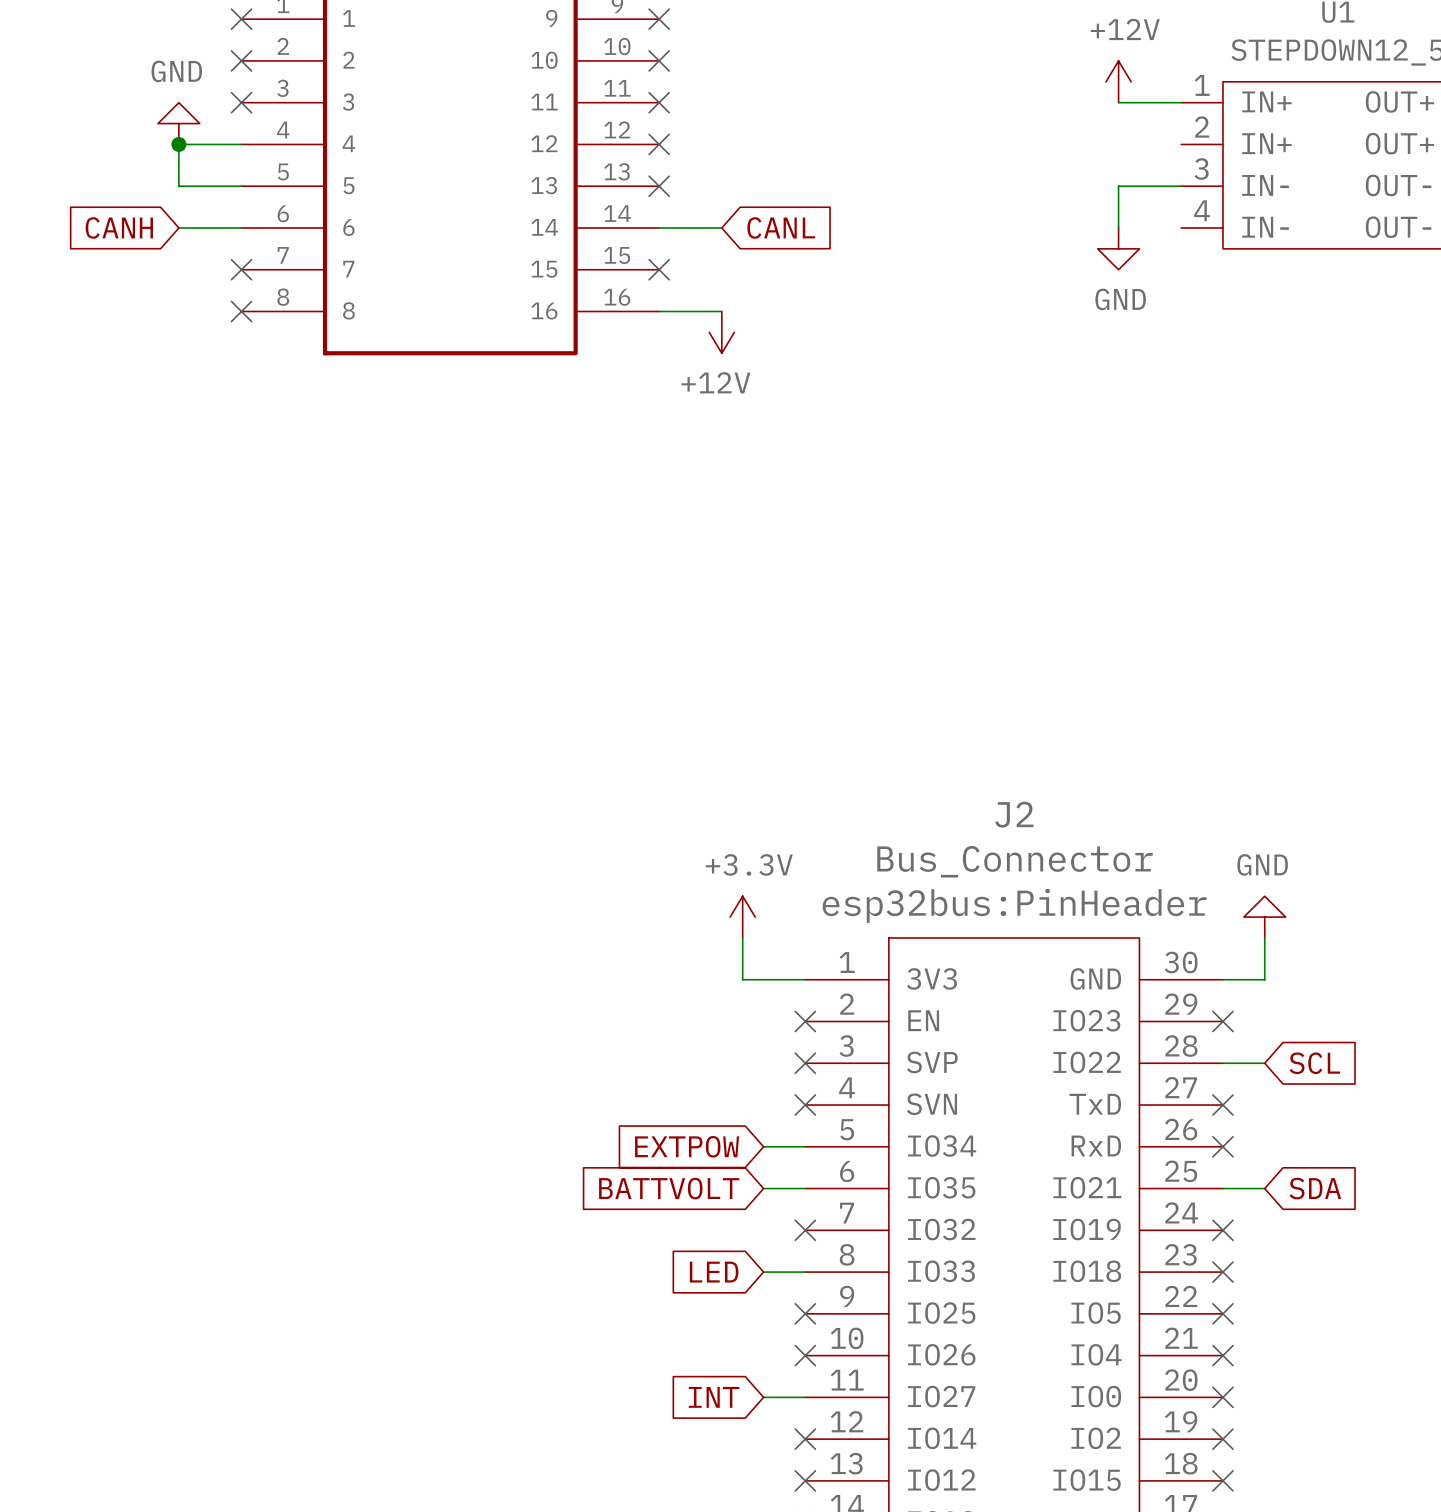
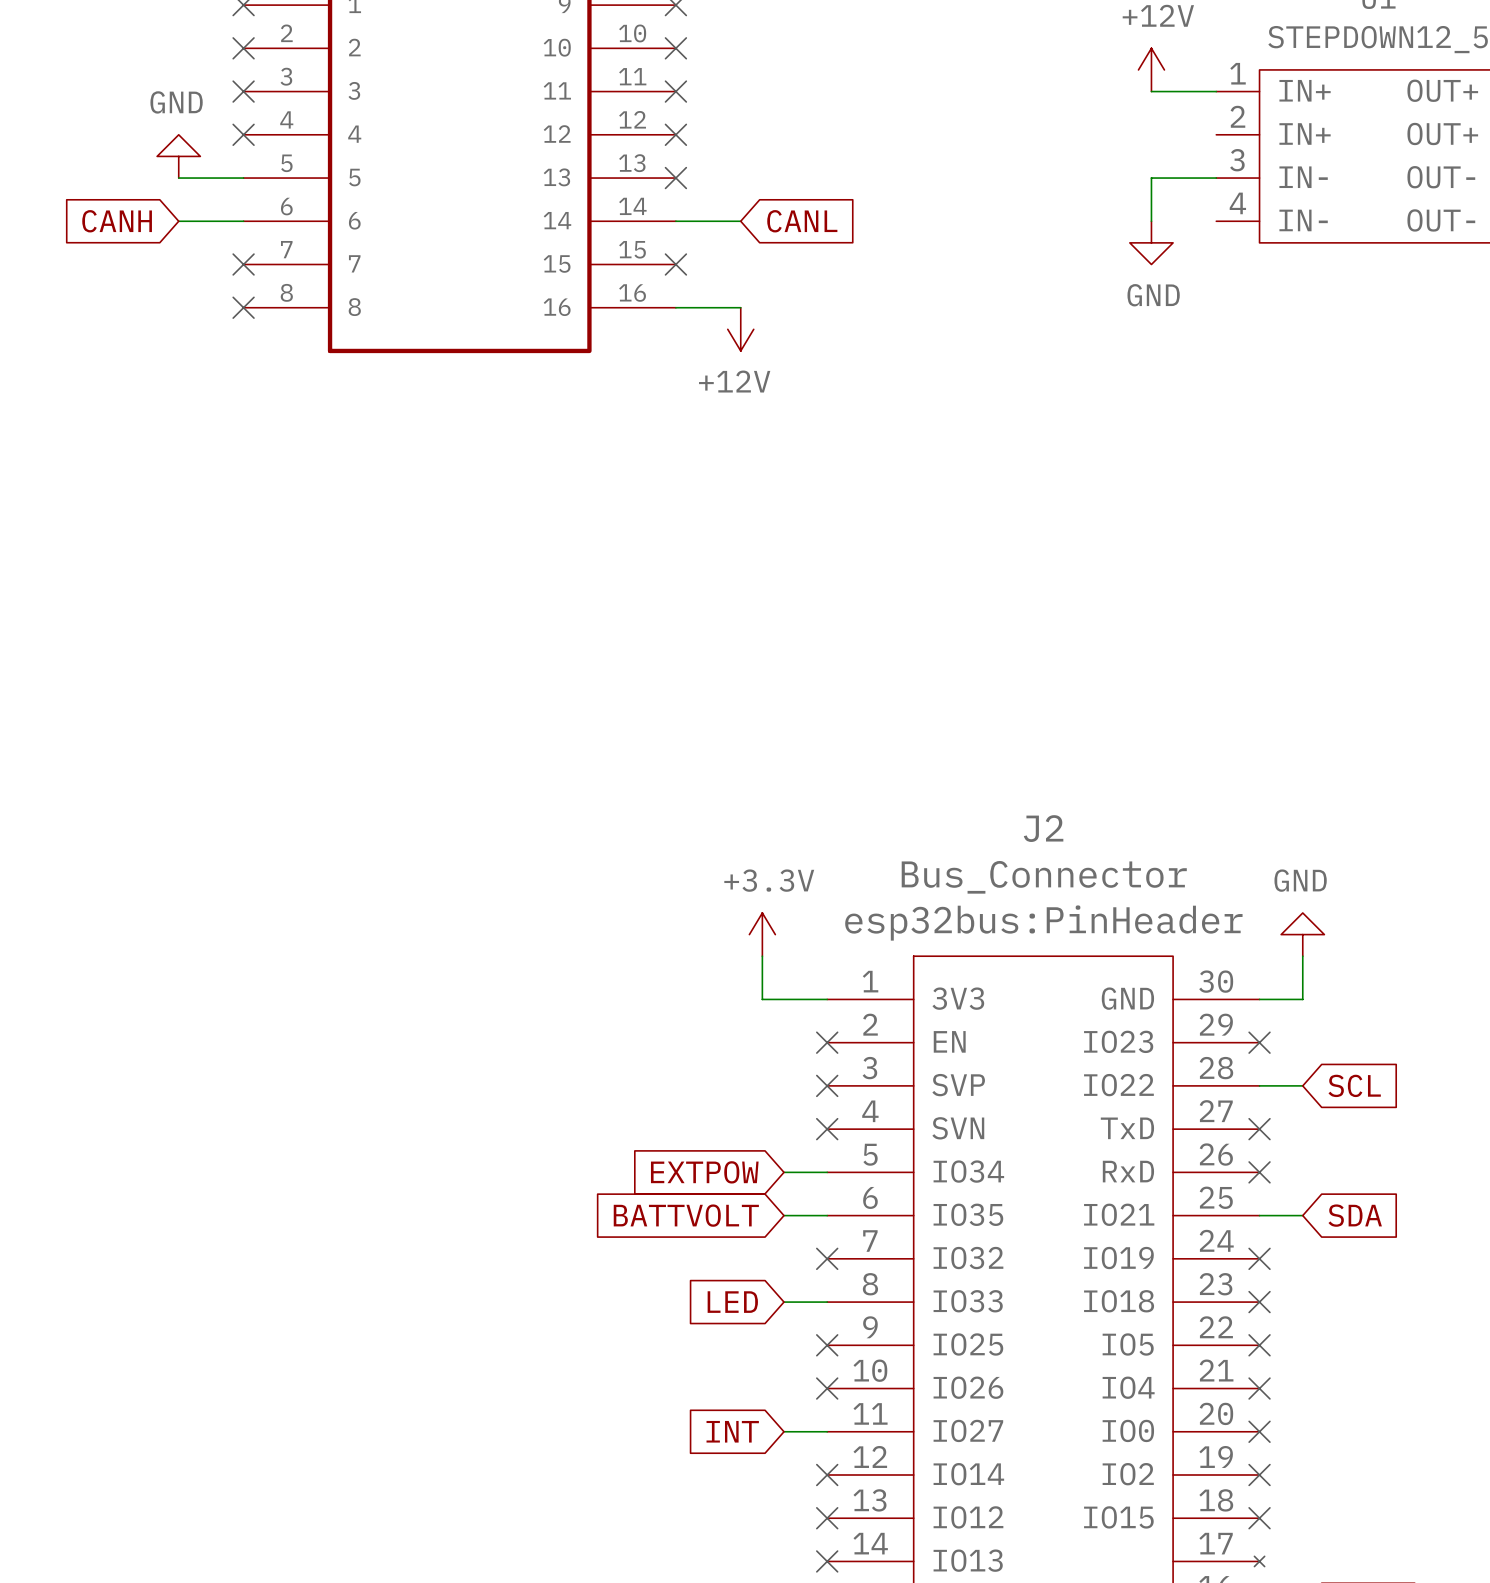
power symbol position: GND (178, 123) -> GND (178, 156)
junction: (178, 144) -> none
wire: (241, 144) (178, 144) (178, 186) -> none
no-connect mark: none -> (243, 134)

